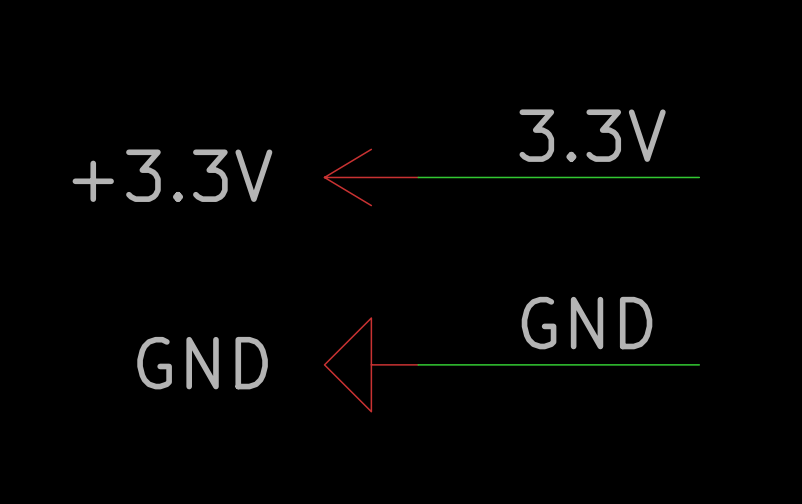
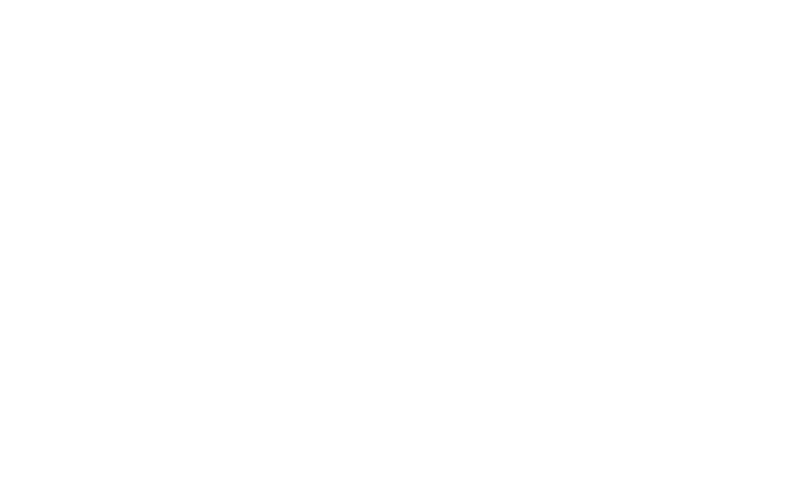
label: 3.3V (592, 135) -> none
power symbol: +3.3V (371, 177) -> none
wire: (418, 177) (699, 177) -> none
label: GND (587, 323) -> none
power symbol: GND (371, 364) -> none
wire: (418, 364) (699, 364) -> none

